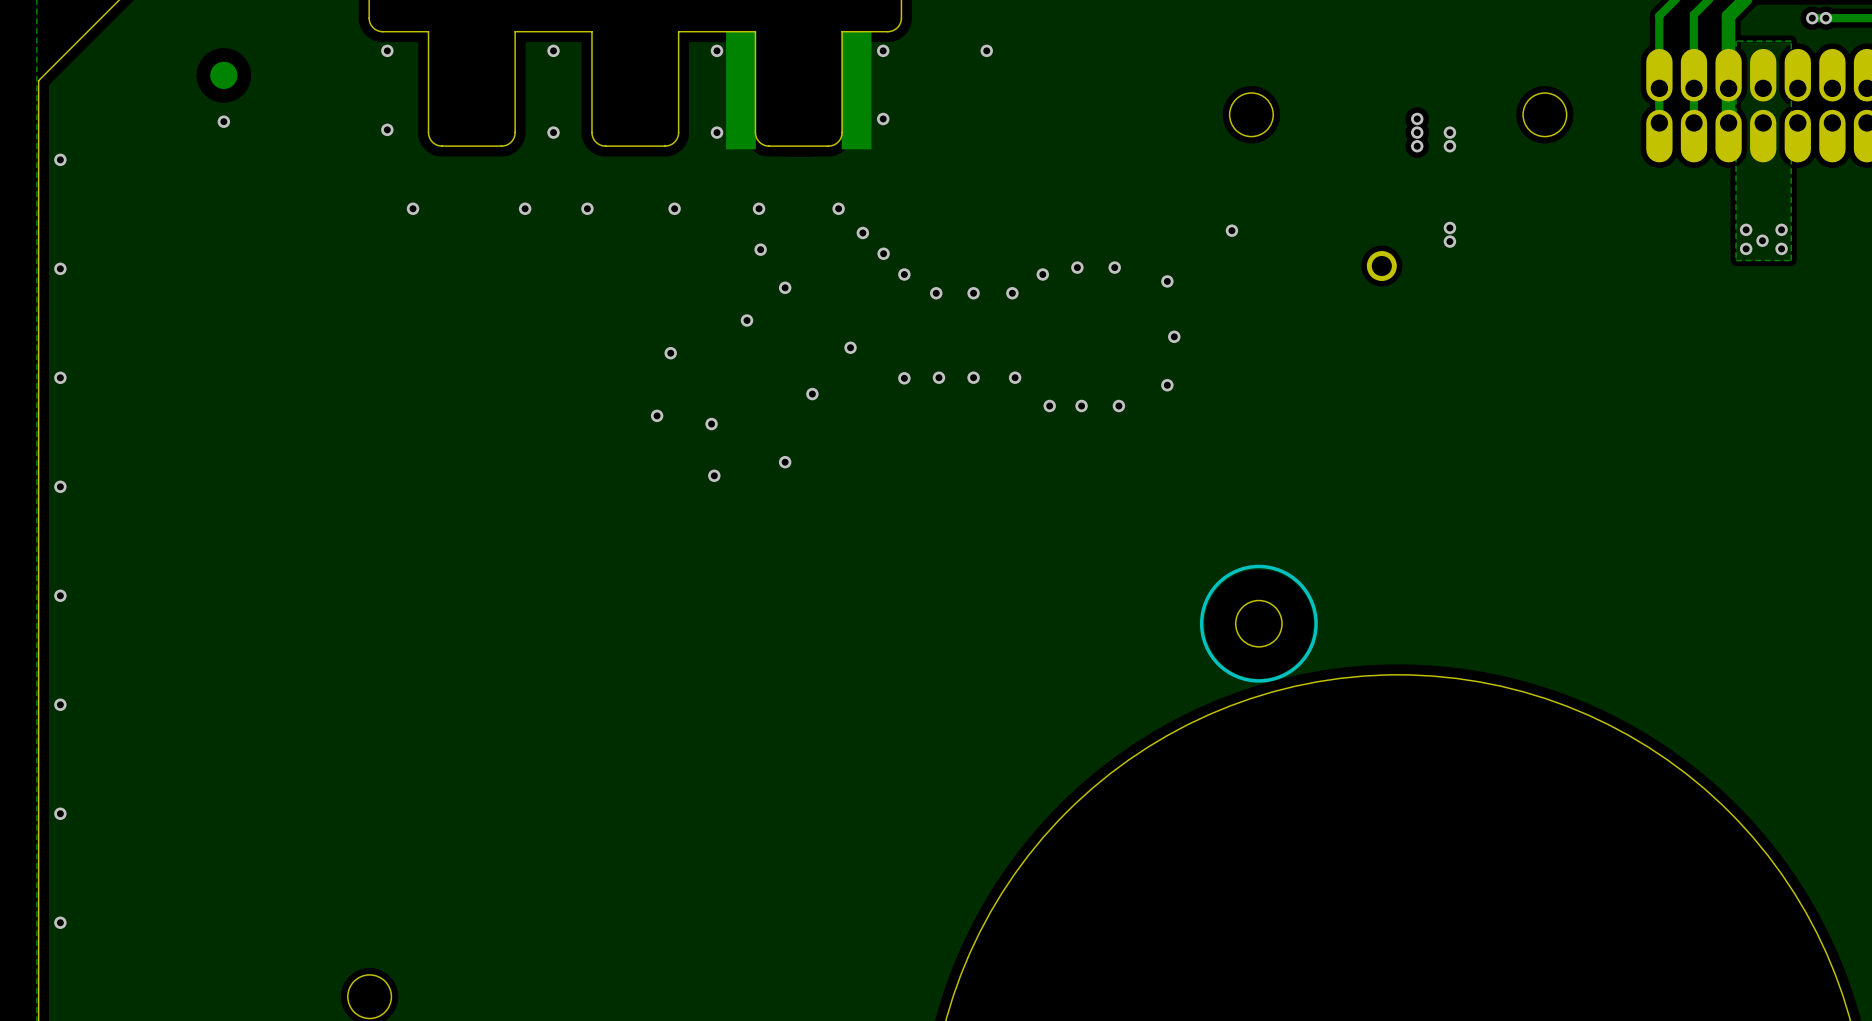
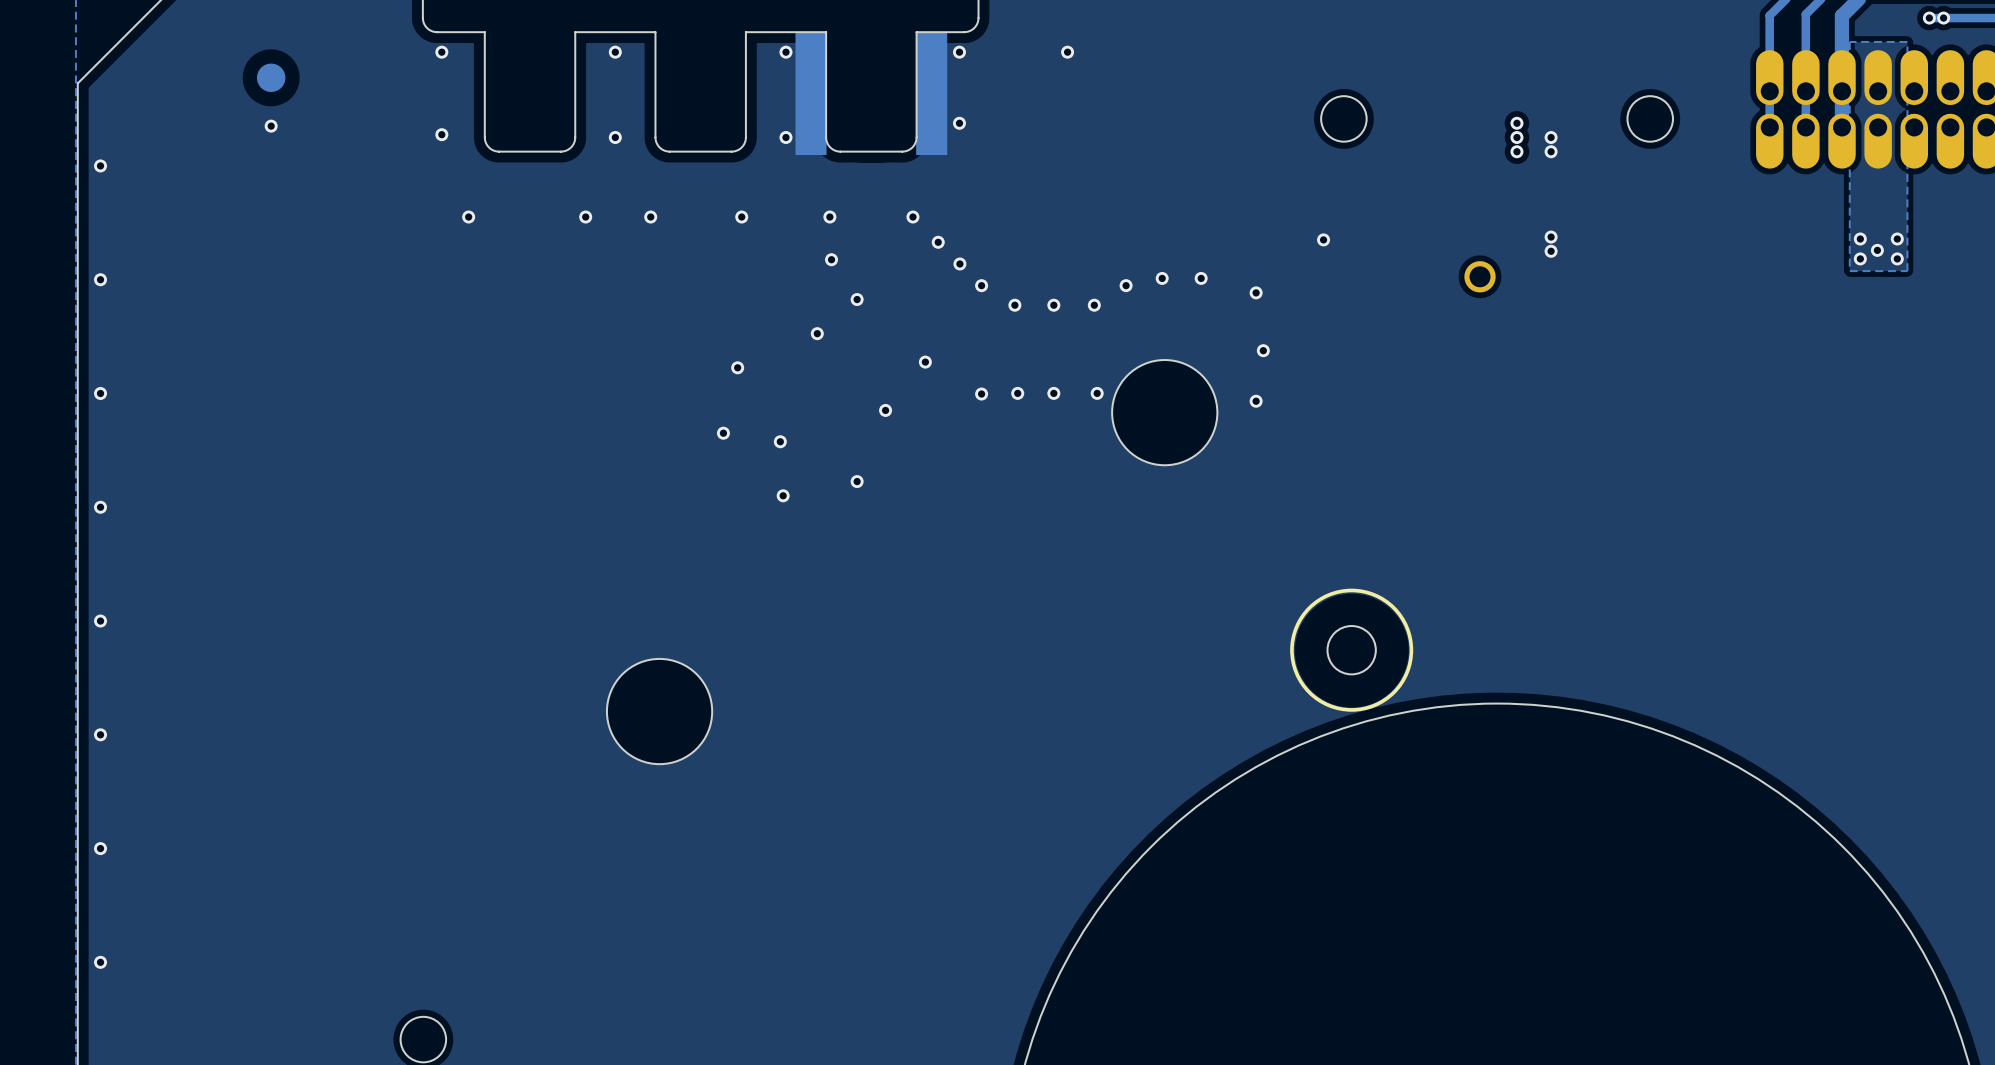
part: none -> (1164, 412)
part: none -> (659, 711)

